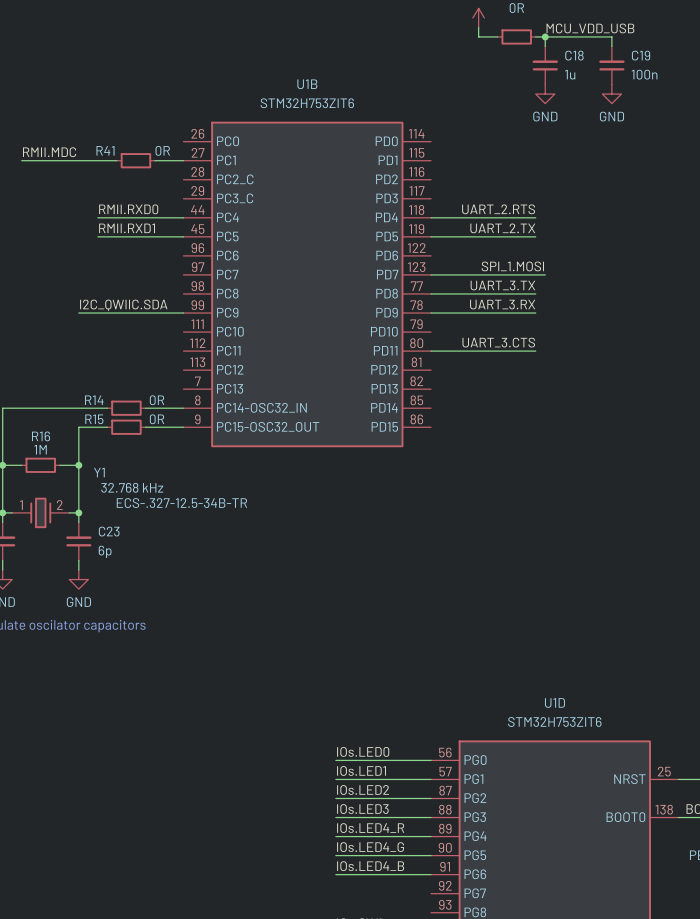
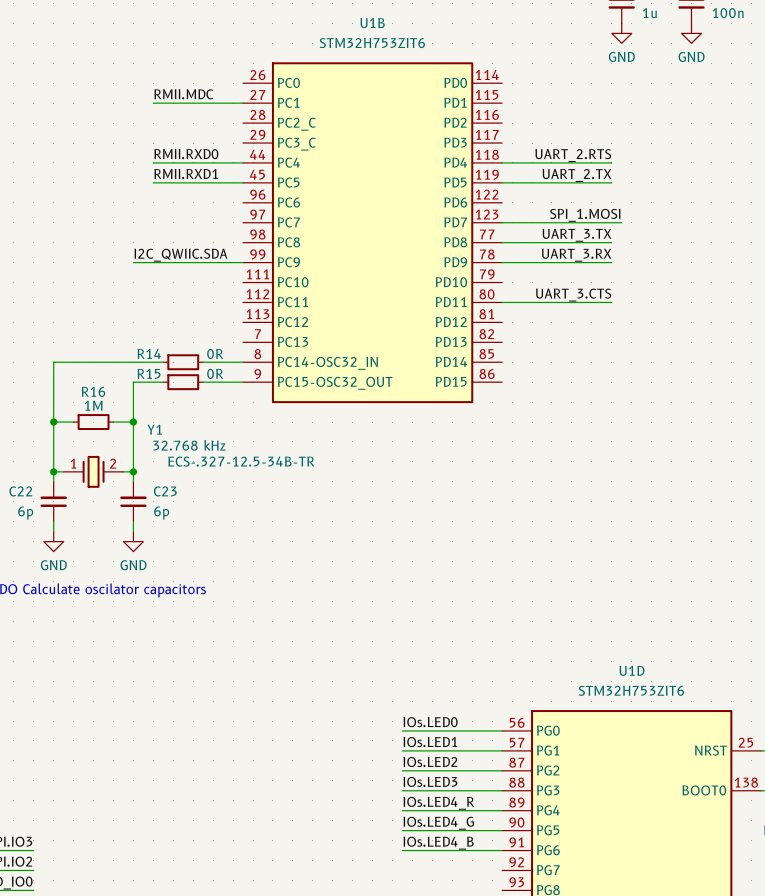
label position: RMII.MDC (49, 152) -> RMII.MDC (183, 94)
wire: (21, 160) (97, 160) -> none
wire: none -> (173, 103) (213, 103)
R41: (135, 160) -> none

